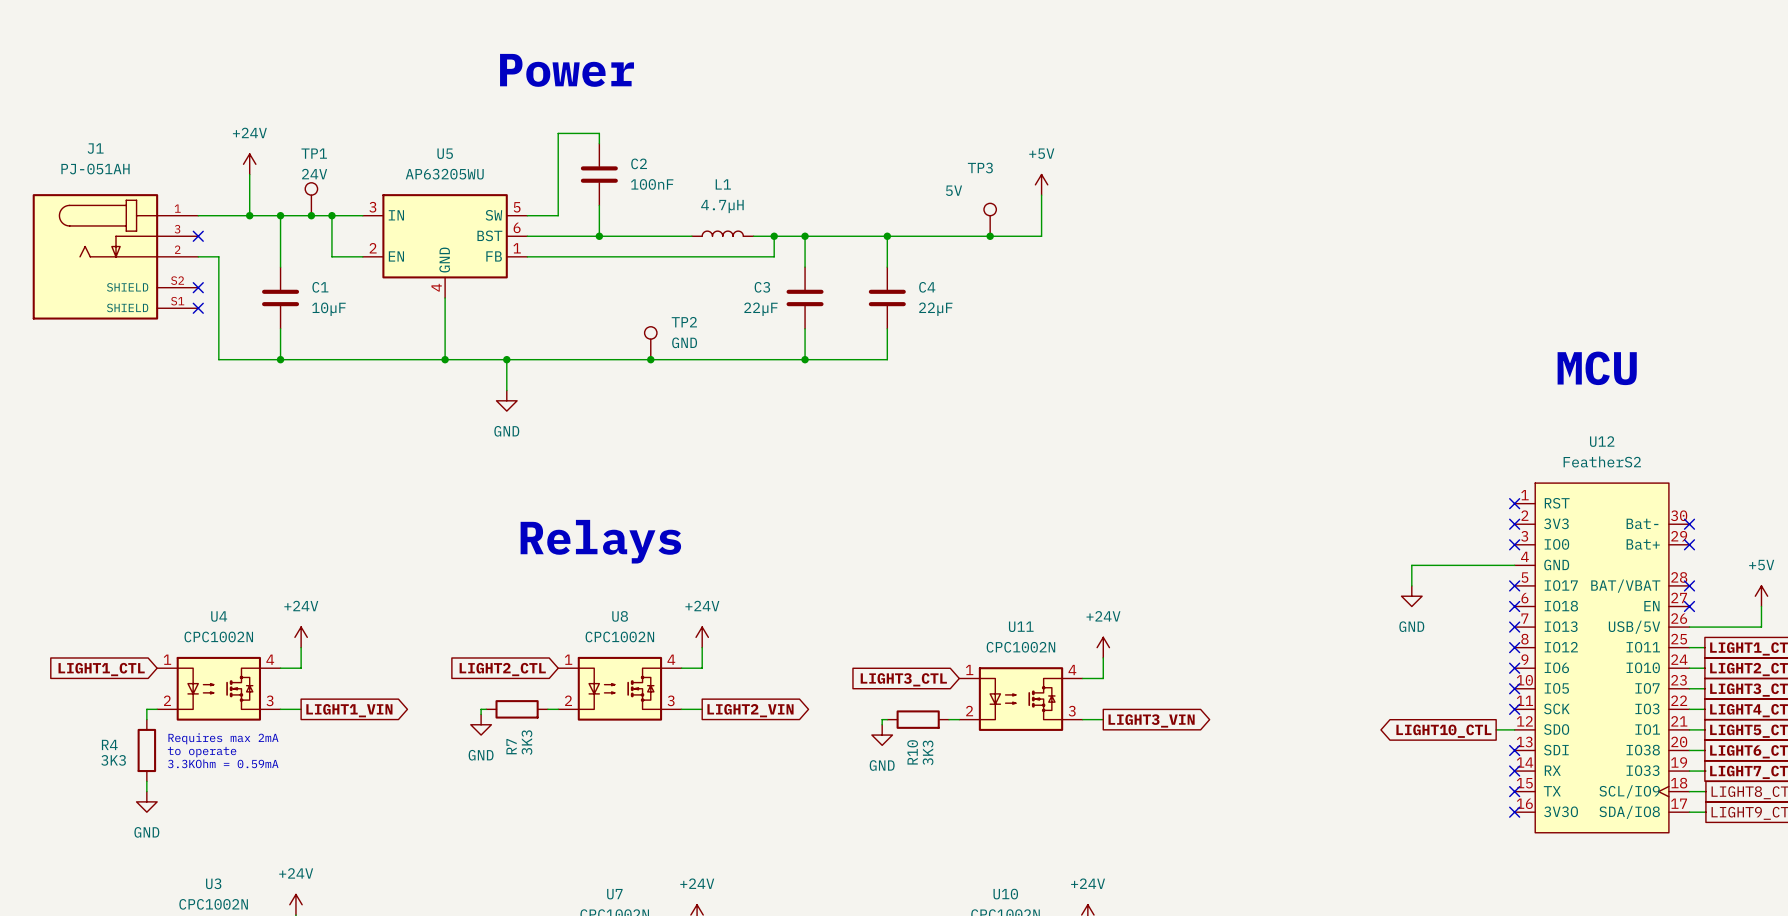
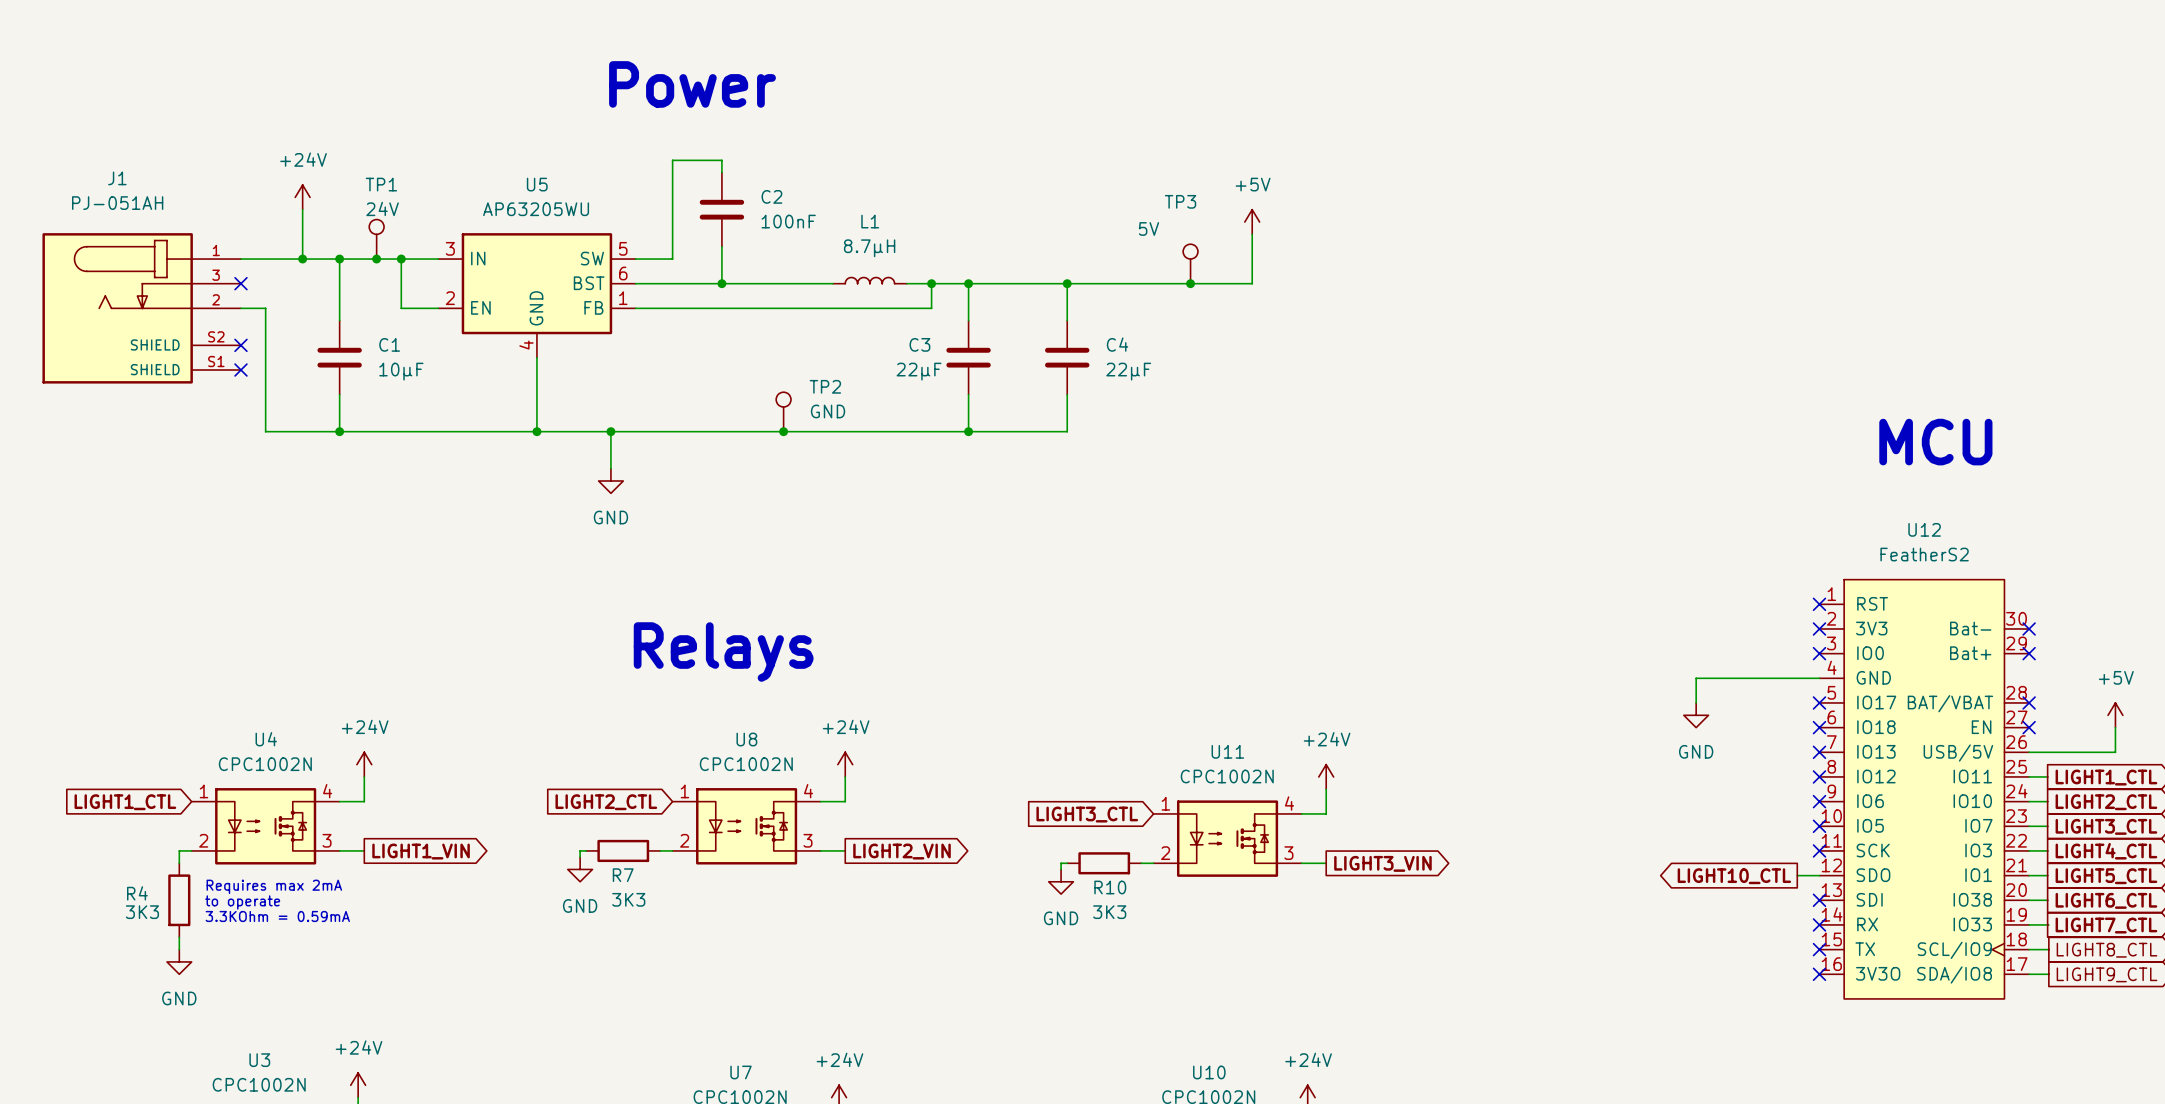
L1 value: 4.7µH (722, 206) -> 8.7µH (869, 248)
R7 value rotation: 0° (526, 742) -> 90° clockwise (628, 899)
R7 name rotation: 0° (511, 746) -> 90° clockwise (623, 875)
R10 name rotation: 0° (912, 752) -> 90° clockwise (1110, 887)
R10 value rotation: 0° (928, 752) -> 90° clockwise (1109, 912)

